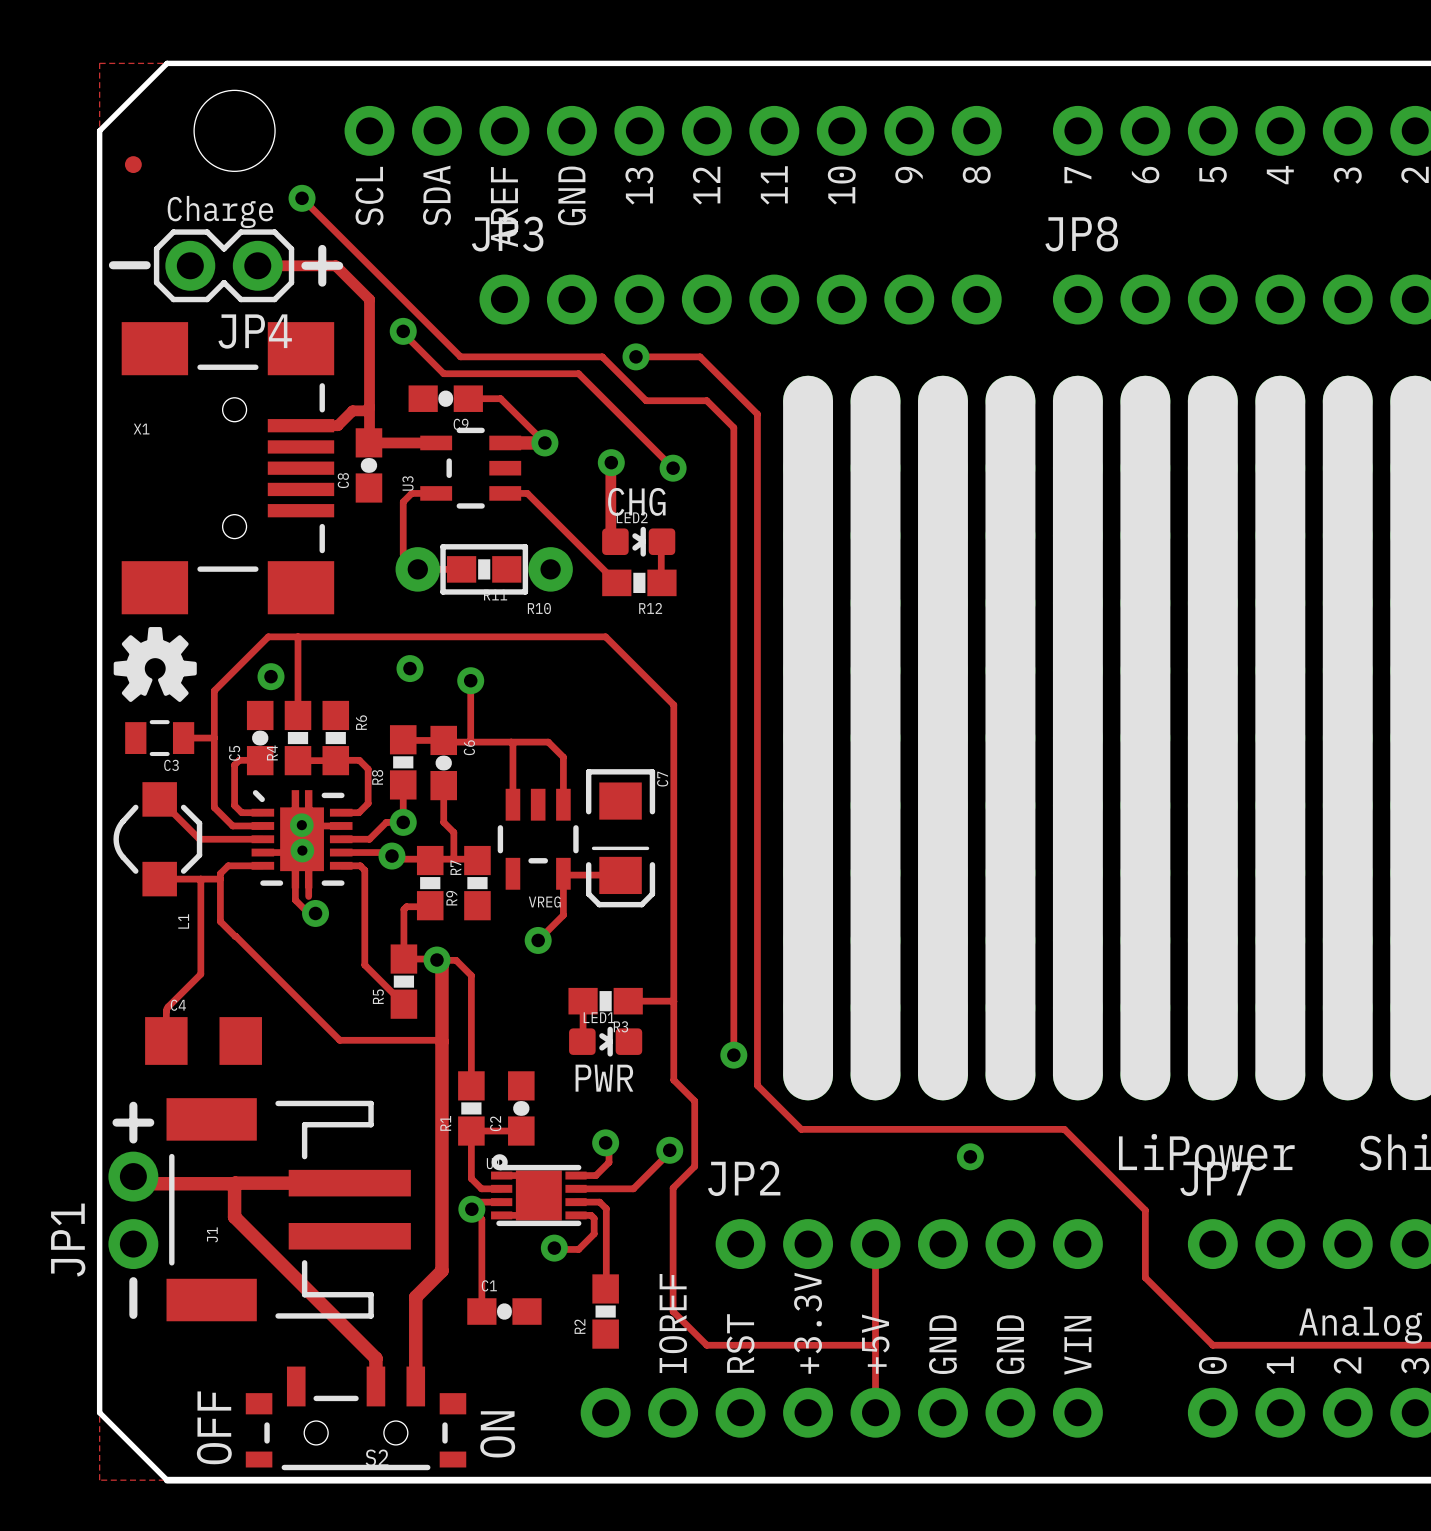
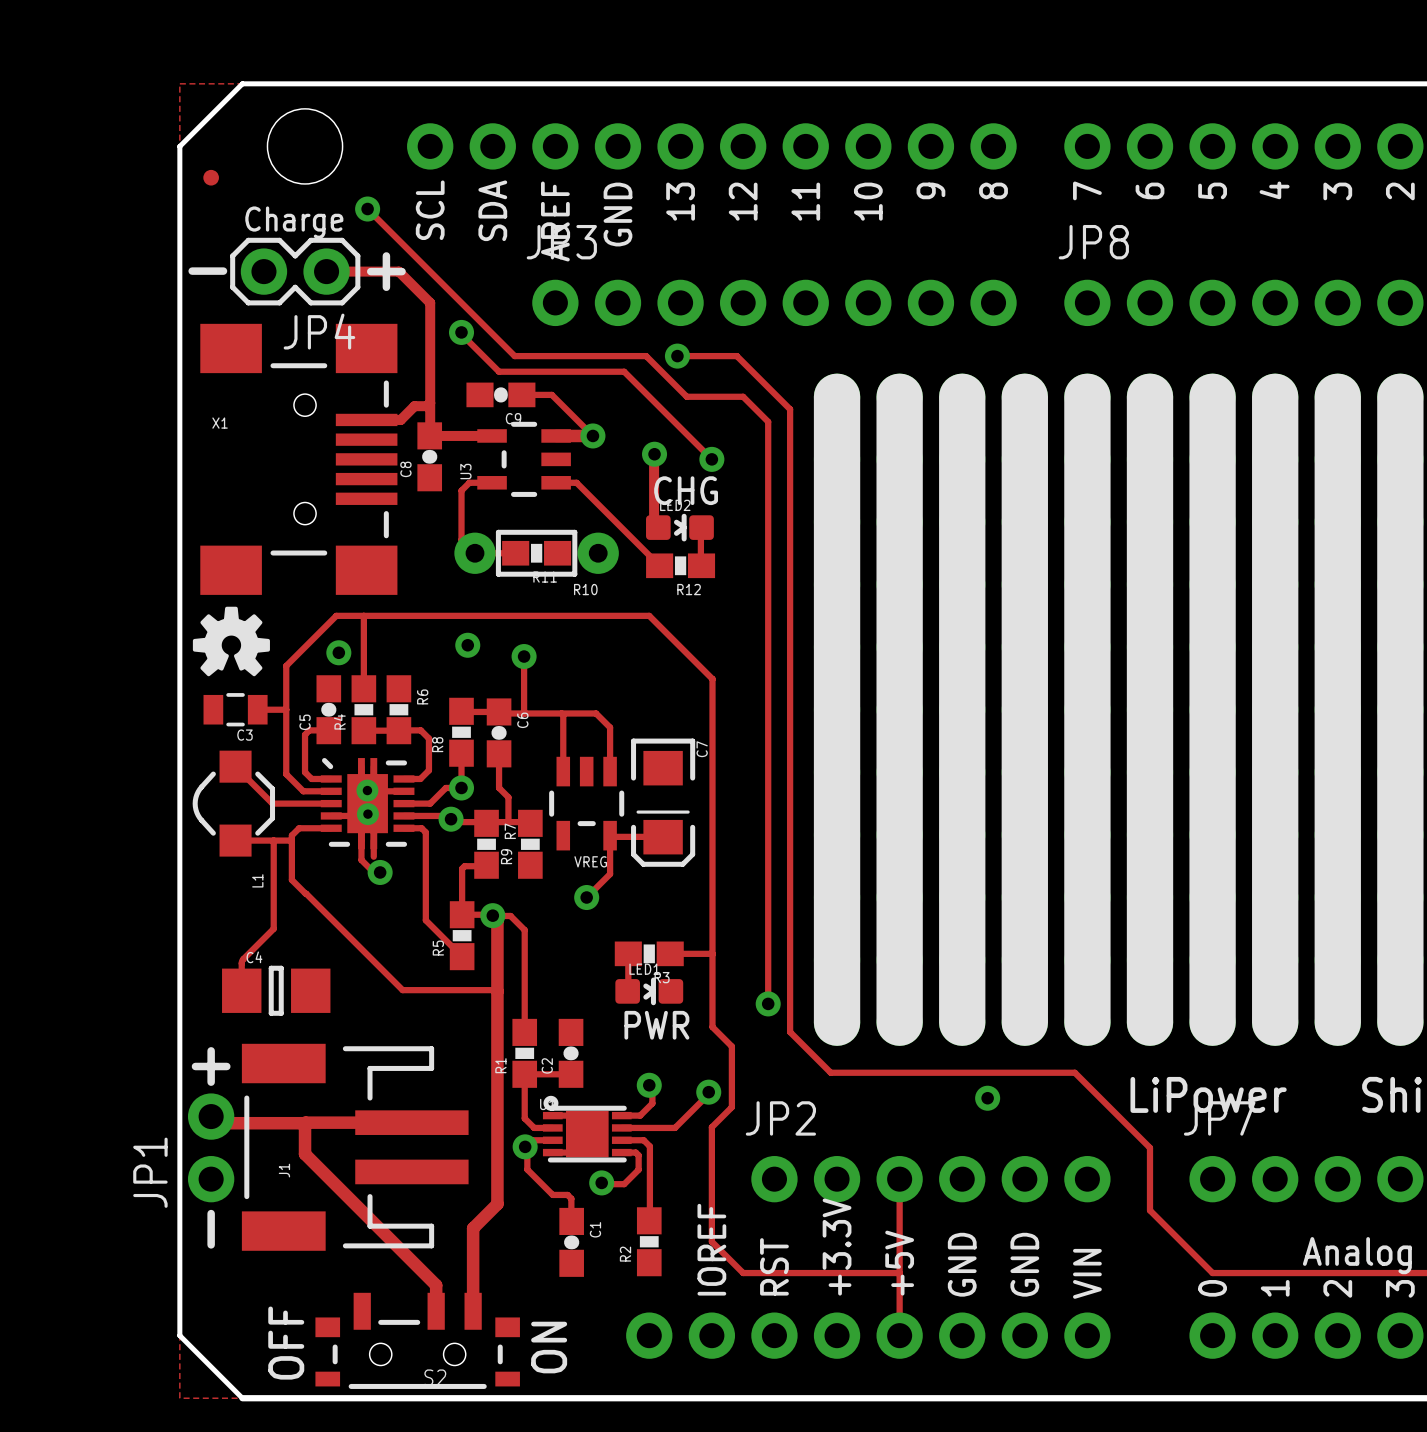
C4 footprint: [145, 1017, 262, 1065] -> [222, 965, 331, 1016]
track: (474, 1211) (481, 1219) (481, 1311) (474, 1303) -> (527, 1149) (527, 1169) (552, 1194) (567, 1194) (571, 1198) (571, 1221)
C1 rotation: 0° (504, 1311) -> 90° clockwise (571, 1242)

